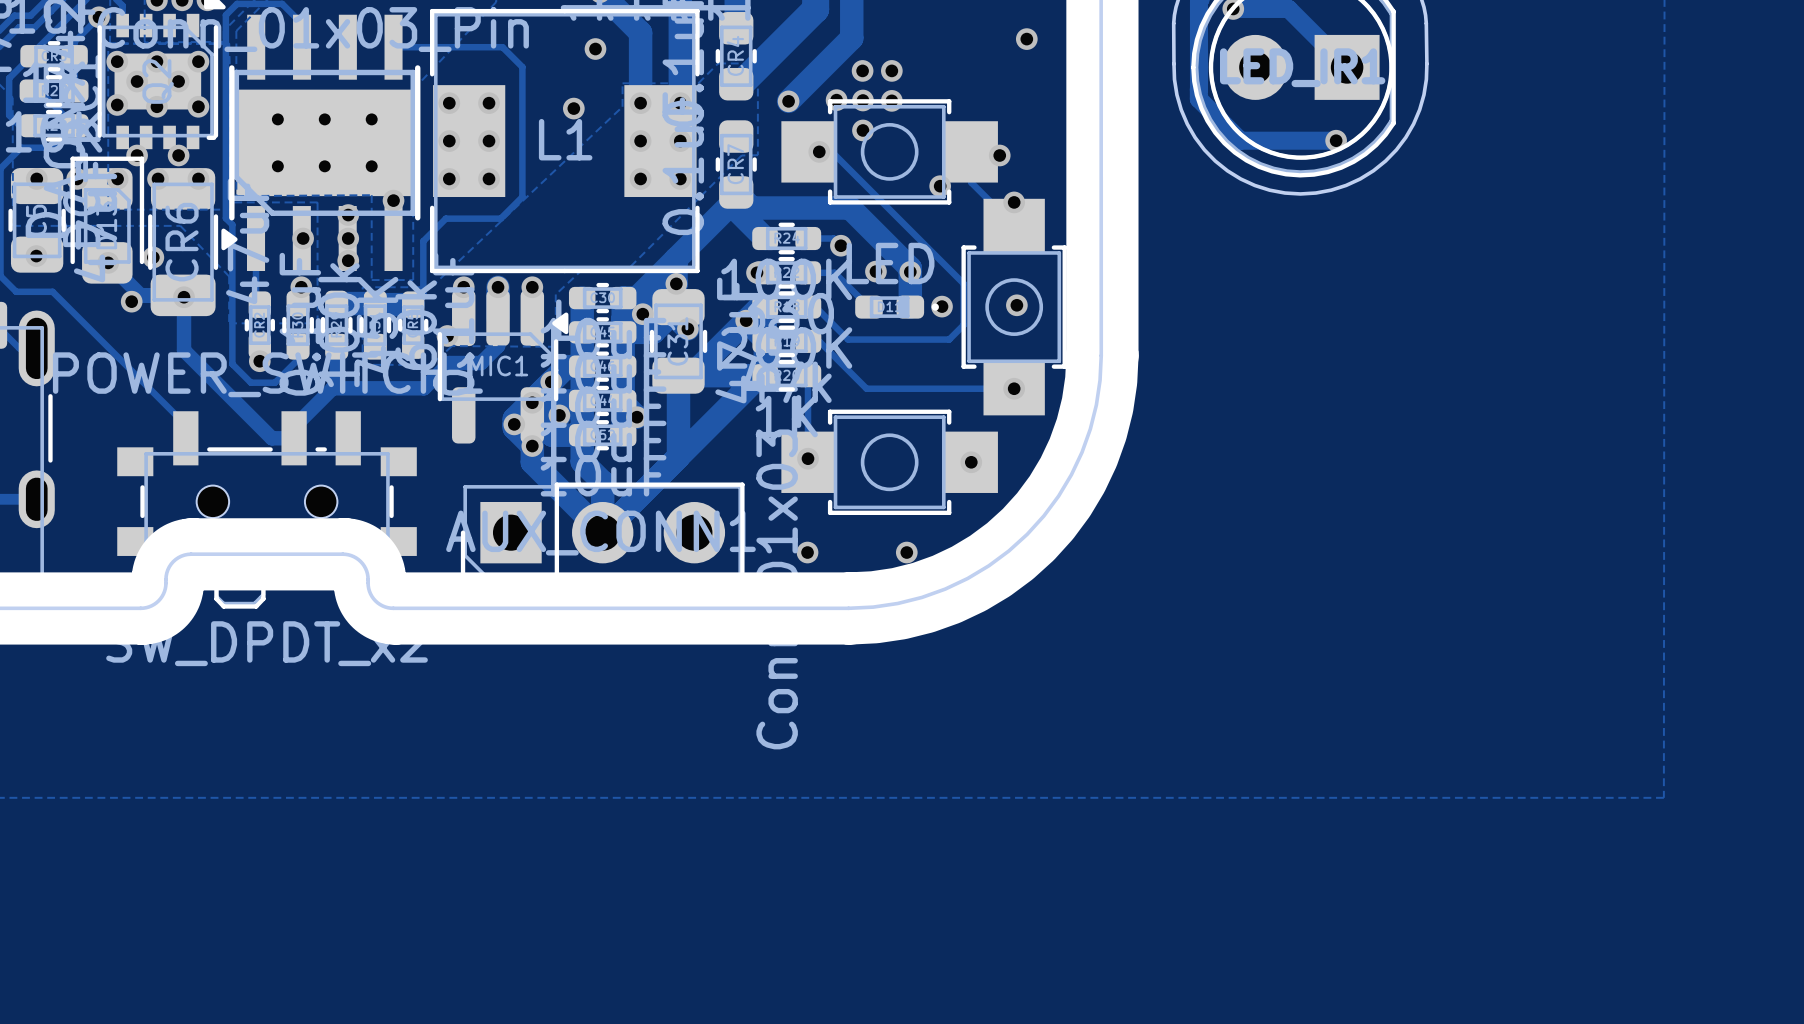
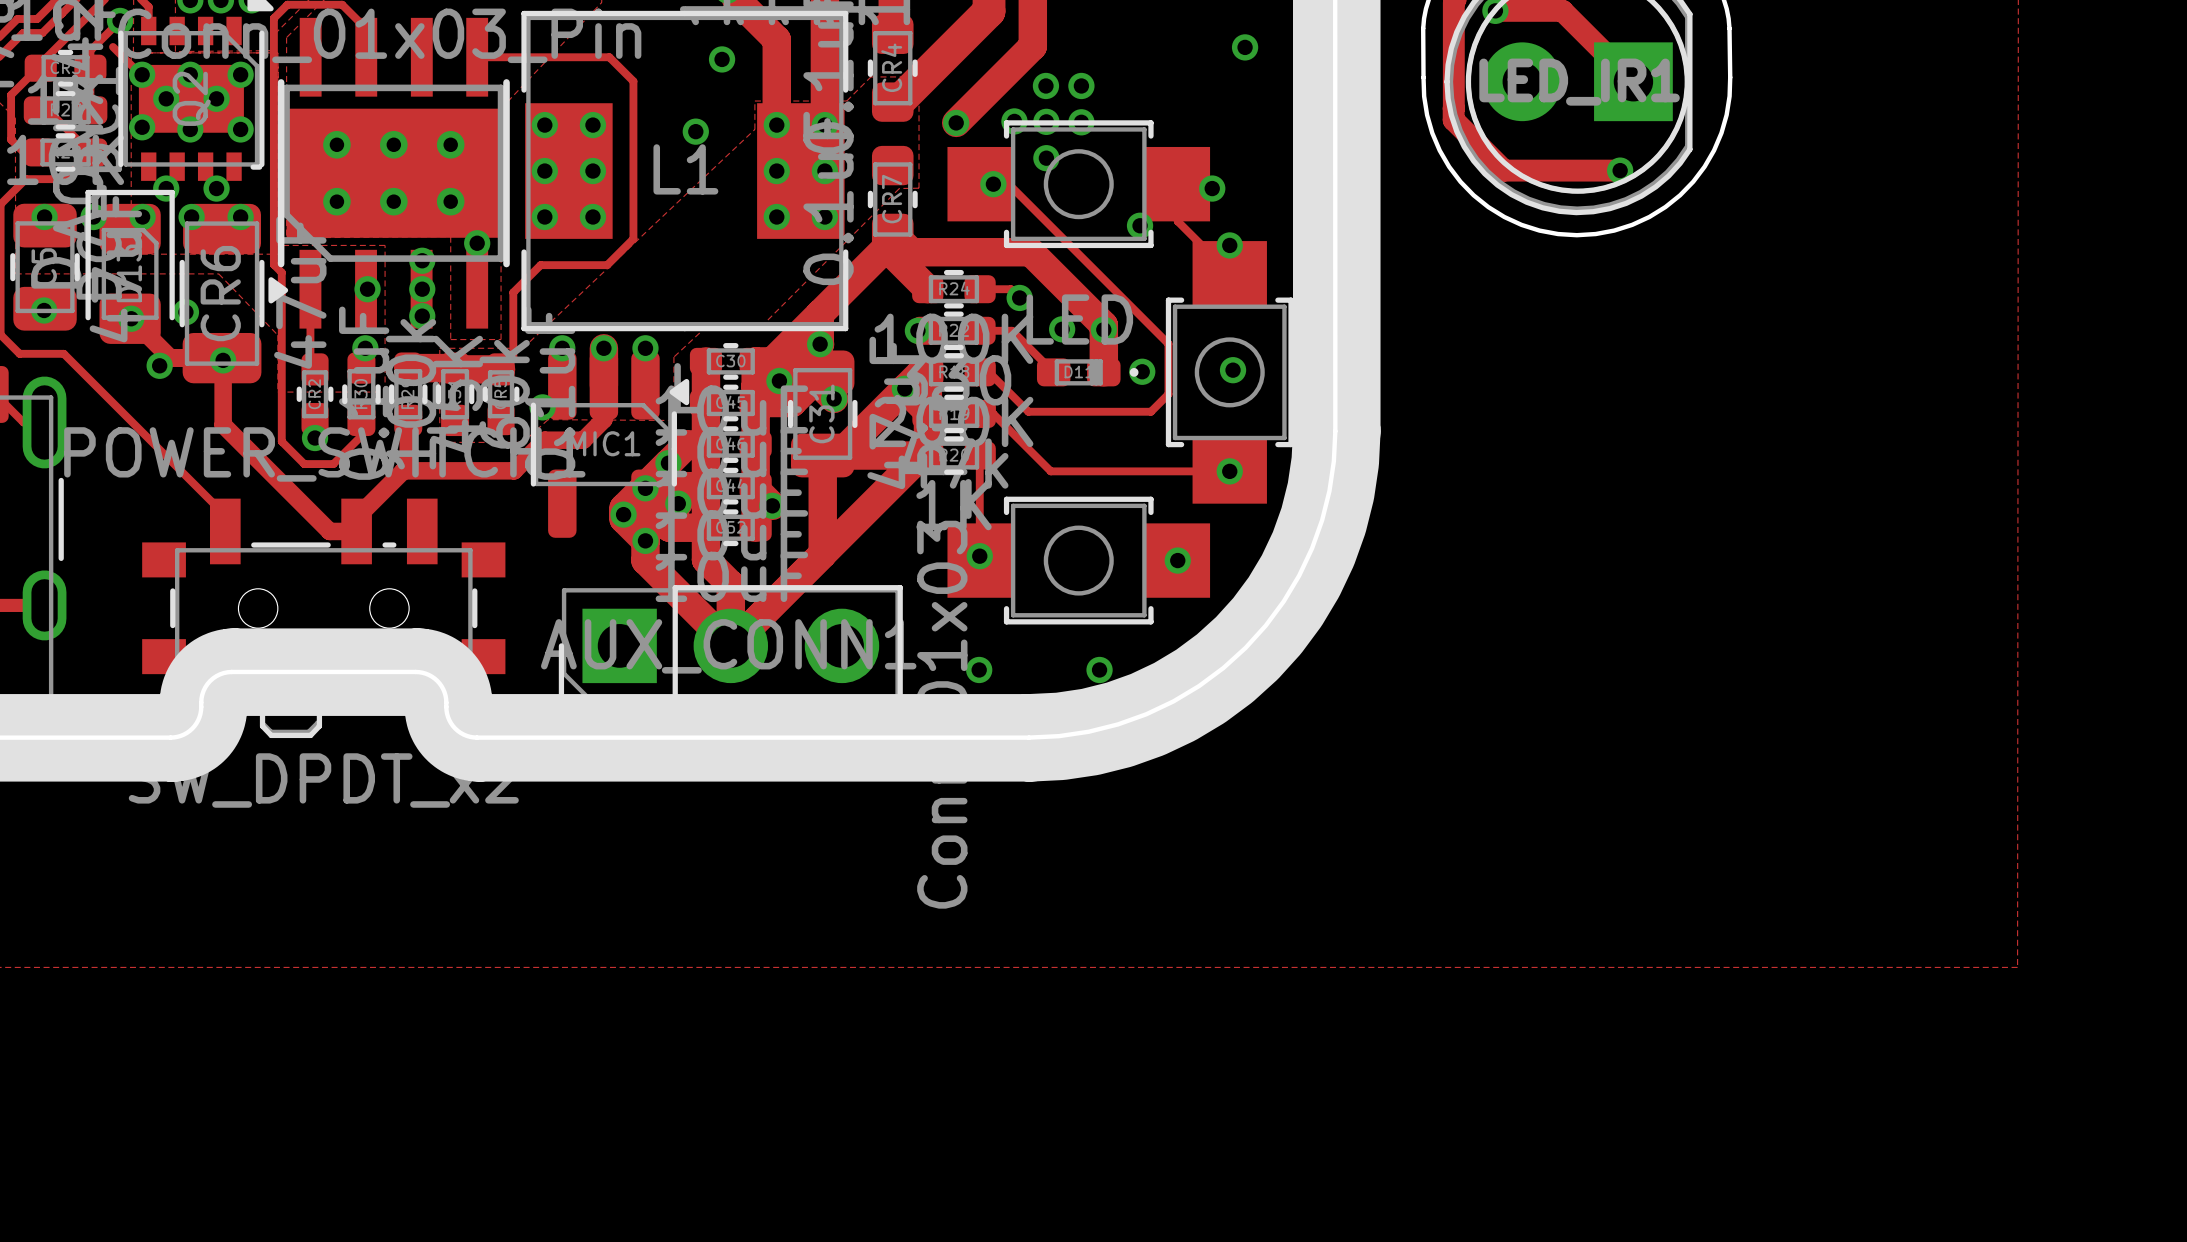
track: none -> (113, 46) (142, 74)

